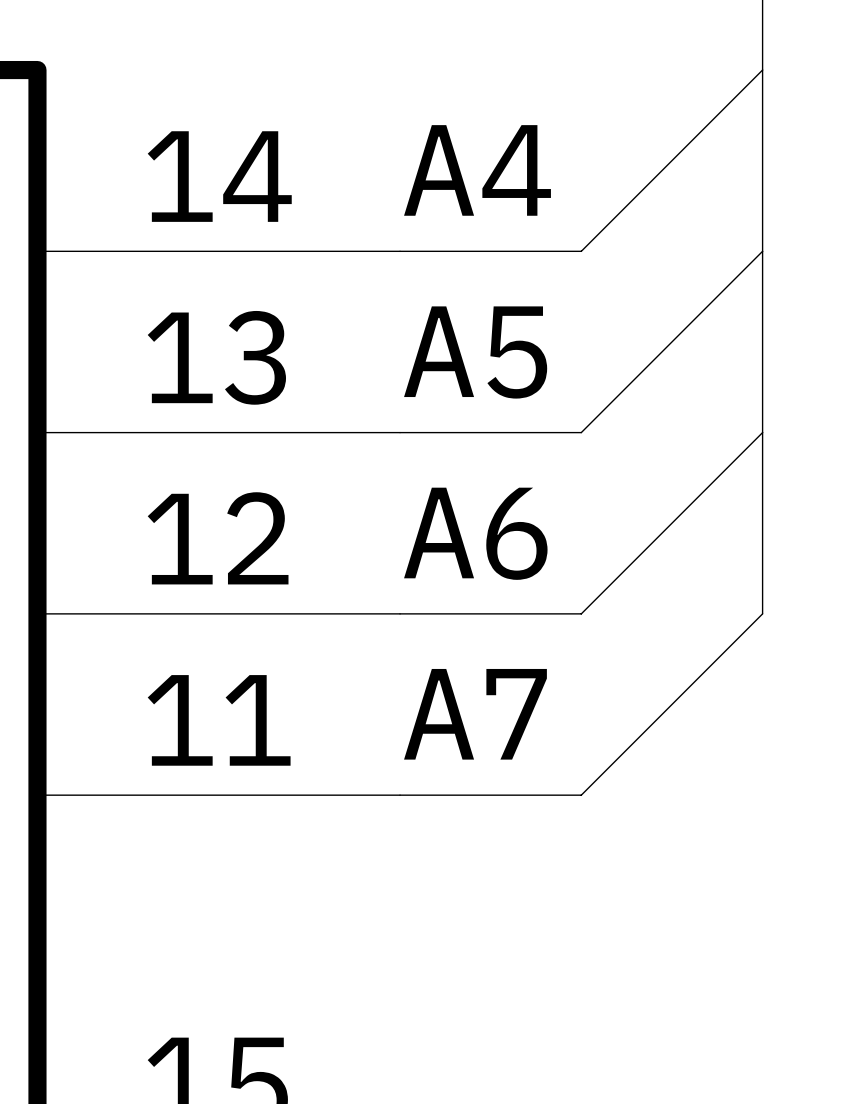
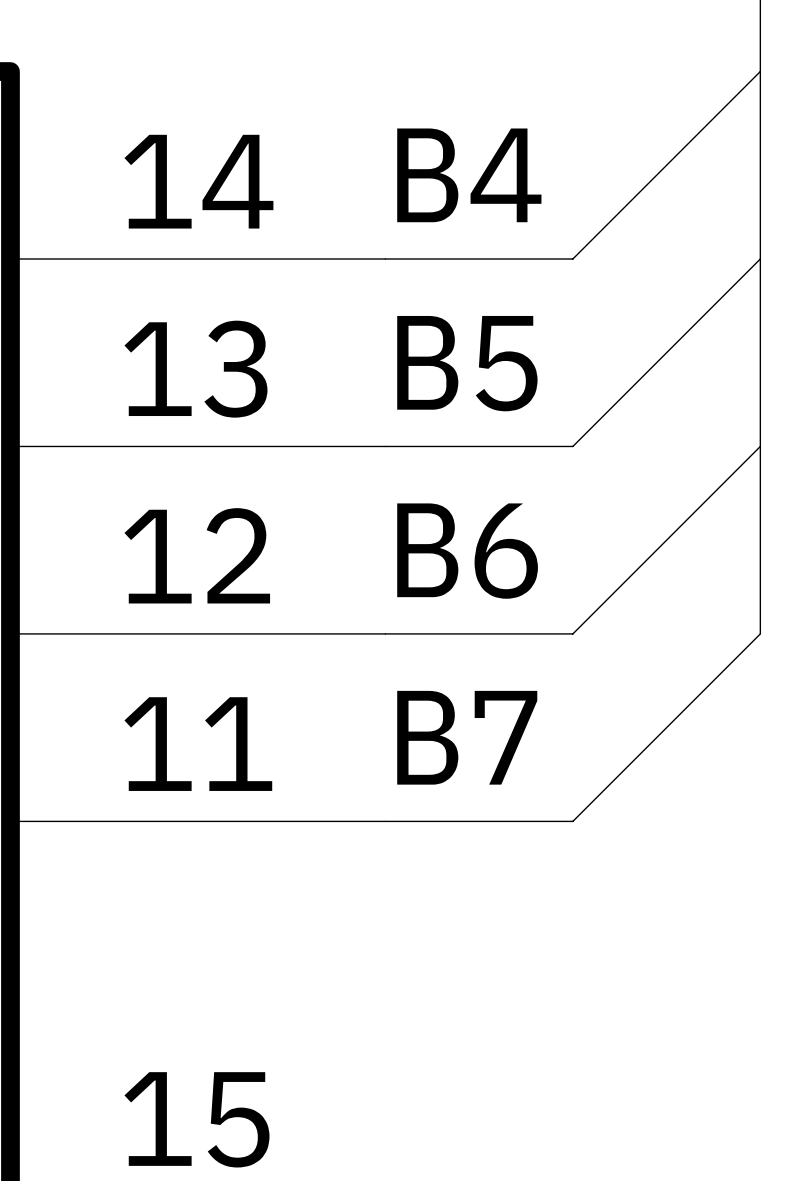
label: A4 (477, 170) -> B4 (469, 175)
label: A5 (475, 352) -> B5 (467, 363)
label: A6 (475, 533) -> B6 (467, 551)
label: A7 (475, 714) -> B7 (467, 737)

